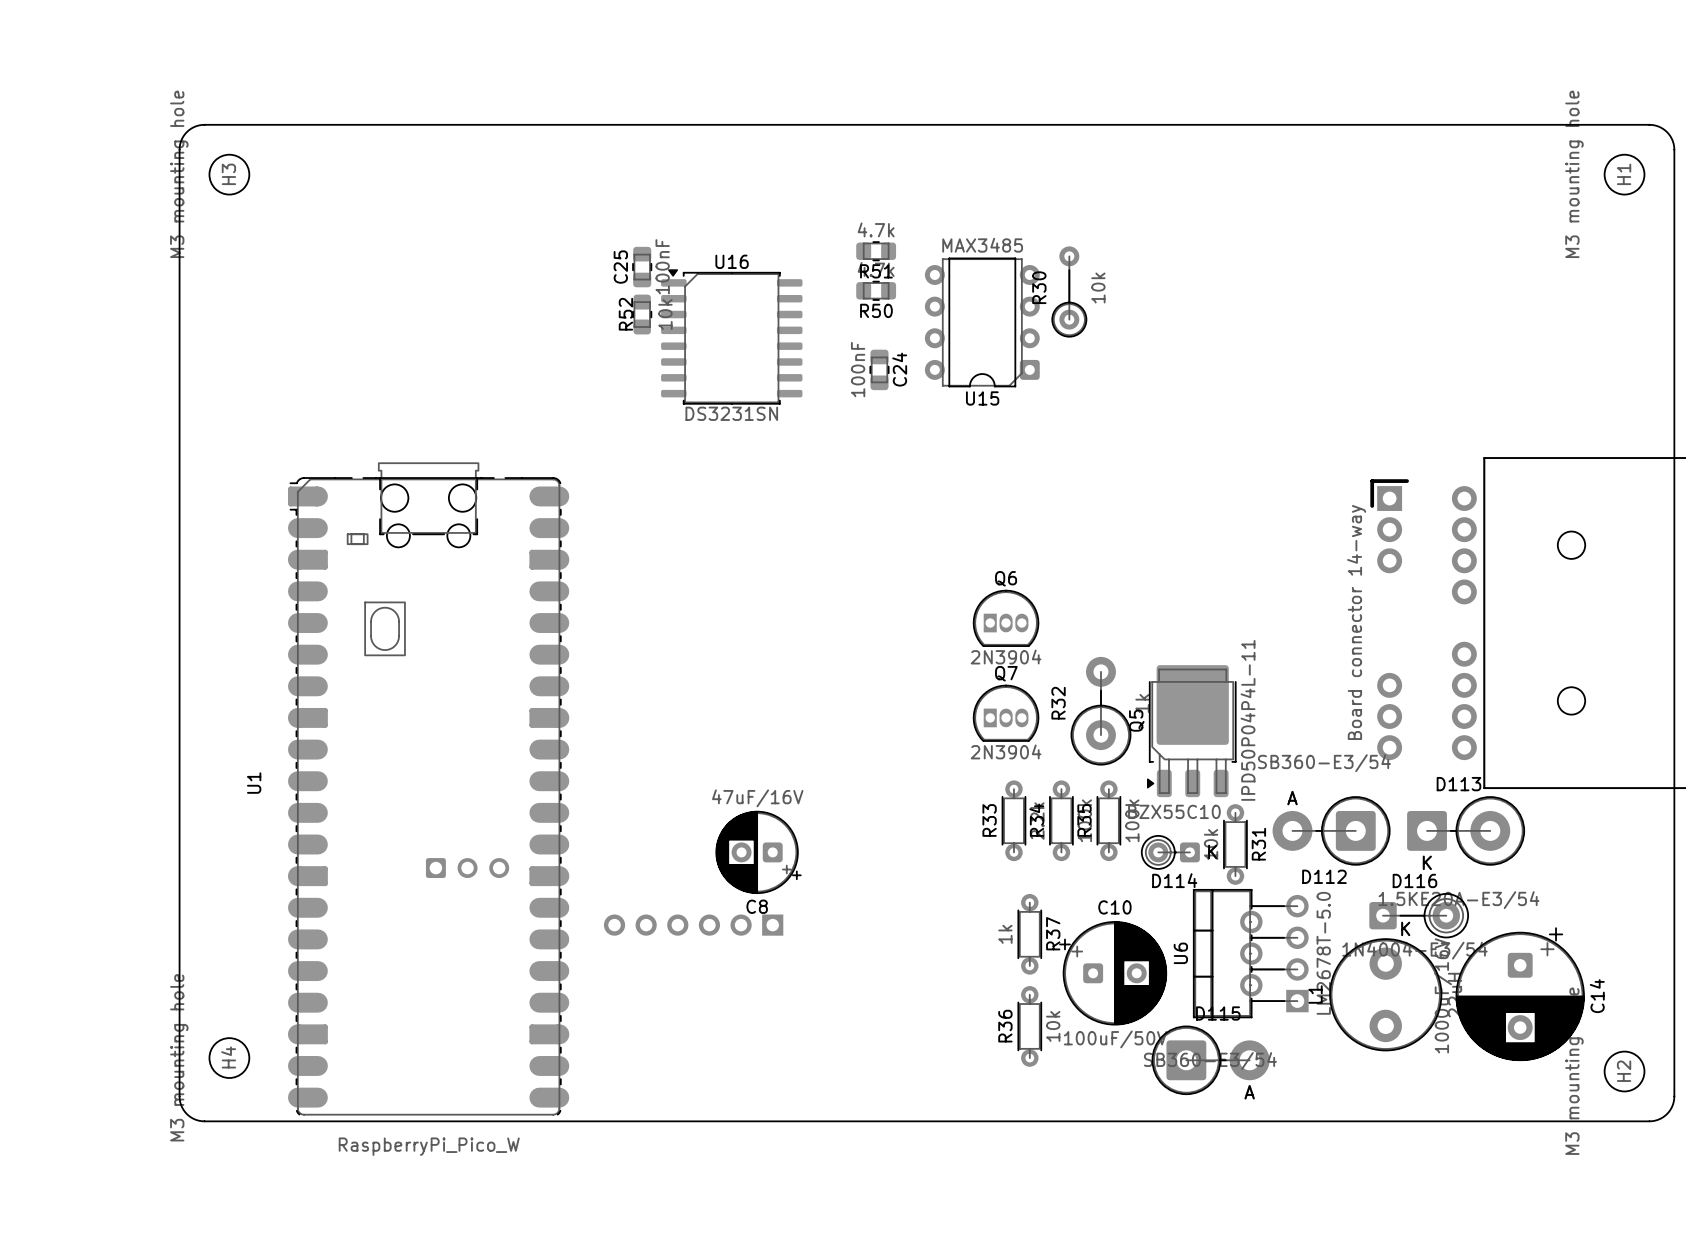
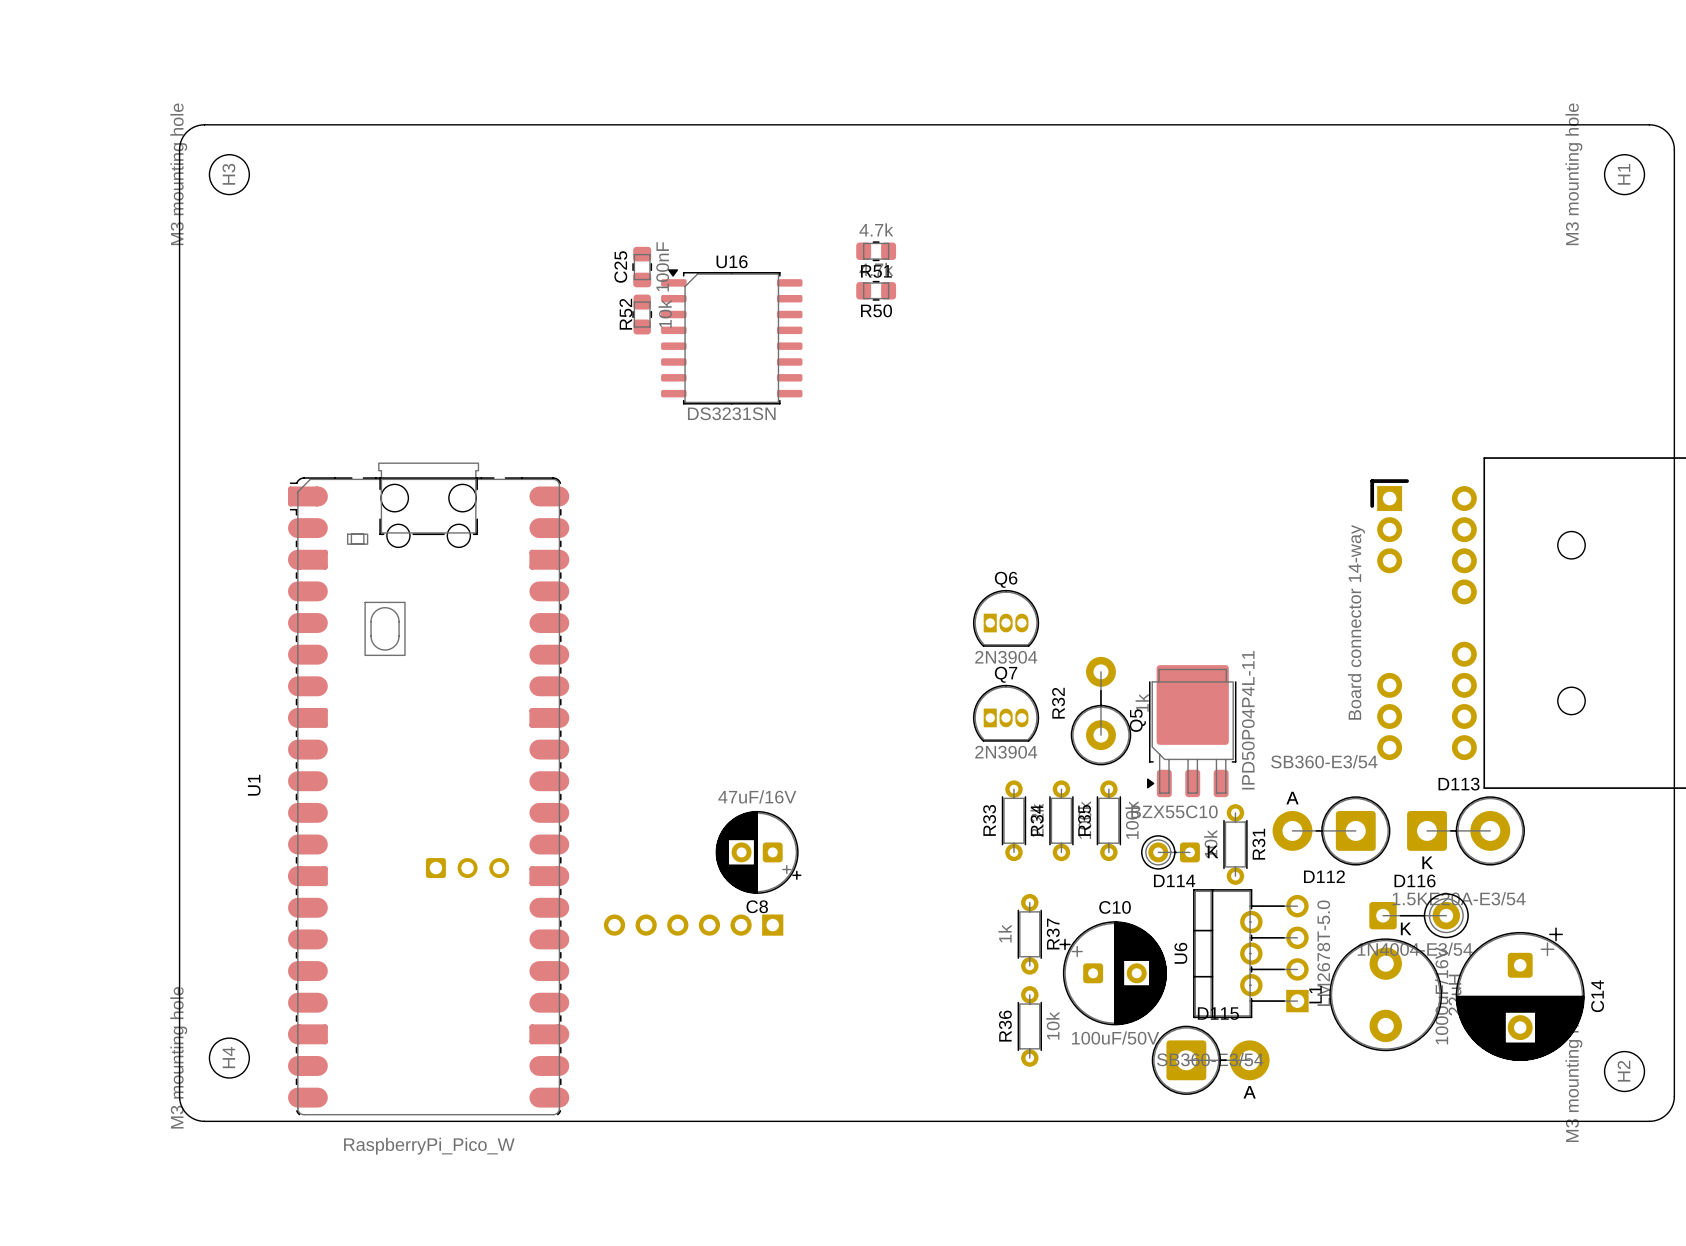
R30: 10k (1069, 291) -> none
U15: MAX3485 (982, 322) -> none
C24: 100nF (879, 369) -> none

